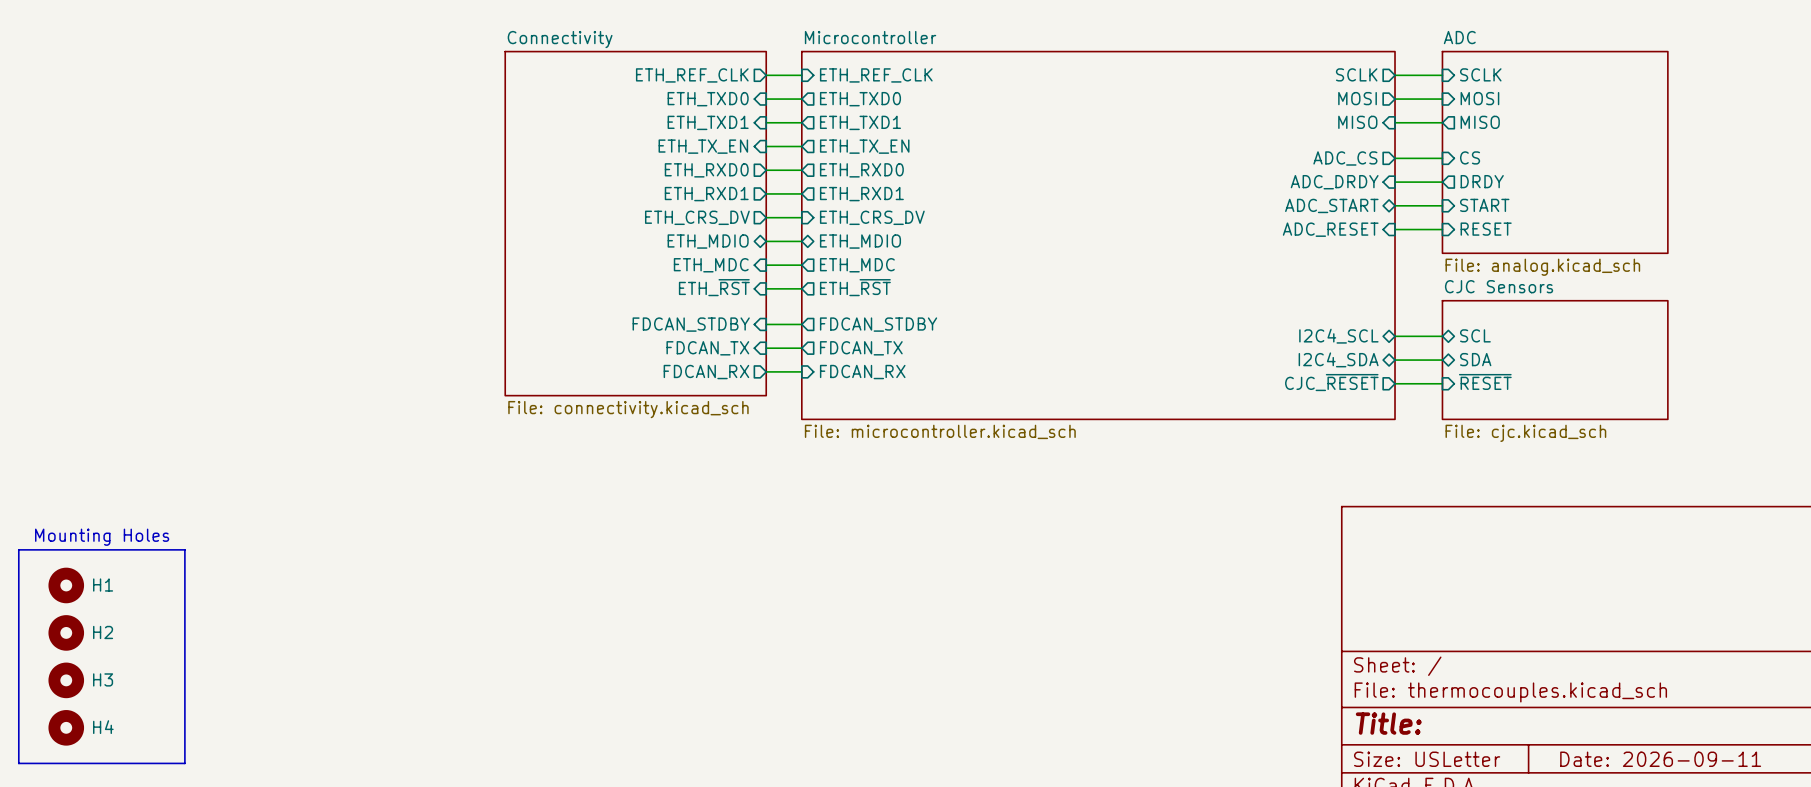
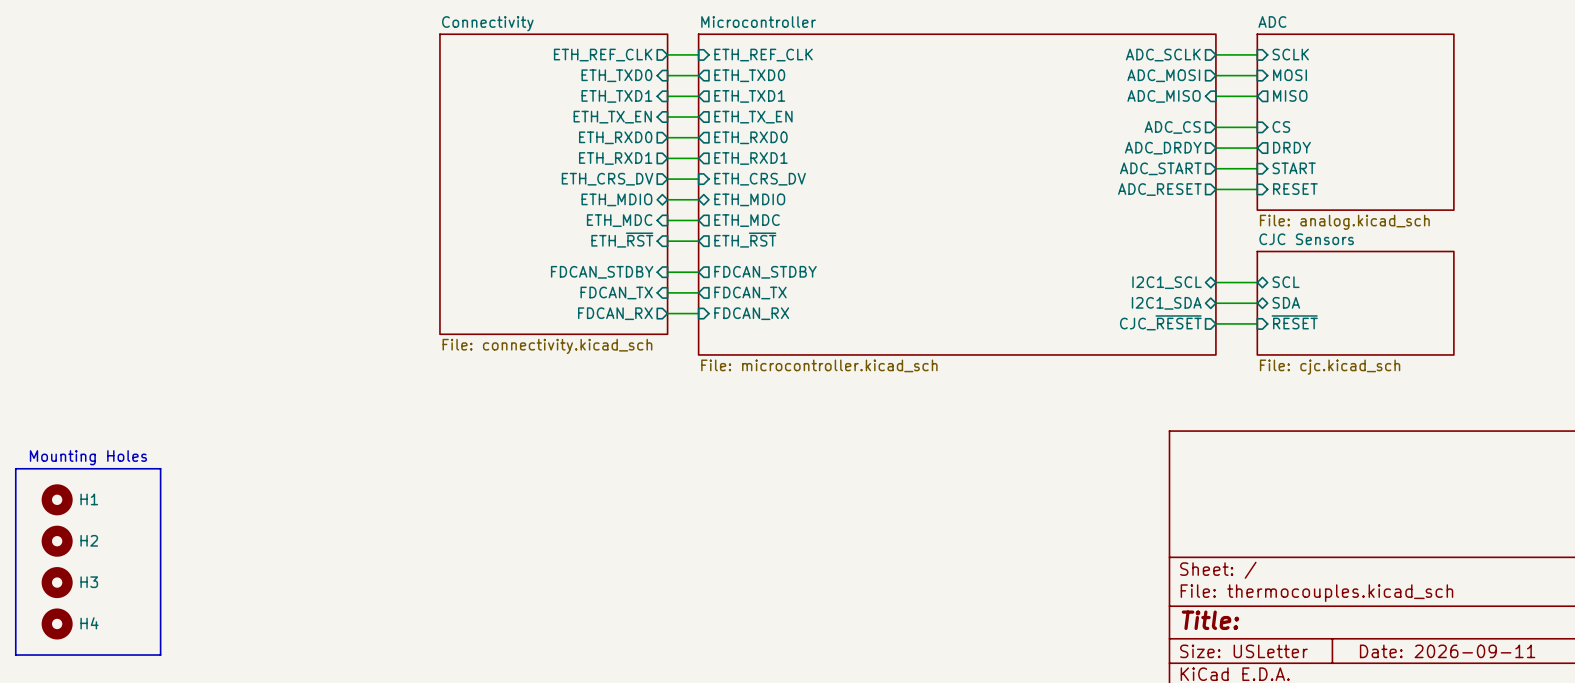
sheet pin: SCLK (1356, 74) -> ADC_SCLK (1163, 55)
sheet pin: MOSI (1357, 98) -> ADC_MOSI (1163, 75)
sheet pin: MISO (1357, 122) -> ADC_MISO (1164, 96)
sheet pin shape: input (1334, 182) -> output (1163, 148)
sheet pin shape: bidirectional (1331, 205) -> output (1160, 168)
sheet pin shape: input (1330, 229) -> output (1159, 189)
sheet pin: I2C4_SCL (1338, 336) -> I2C1_SCL (1166, 282)
sheet pin: I2C4_SDA (1338, 359) -> I2C1_SDA (1166, 303)

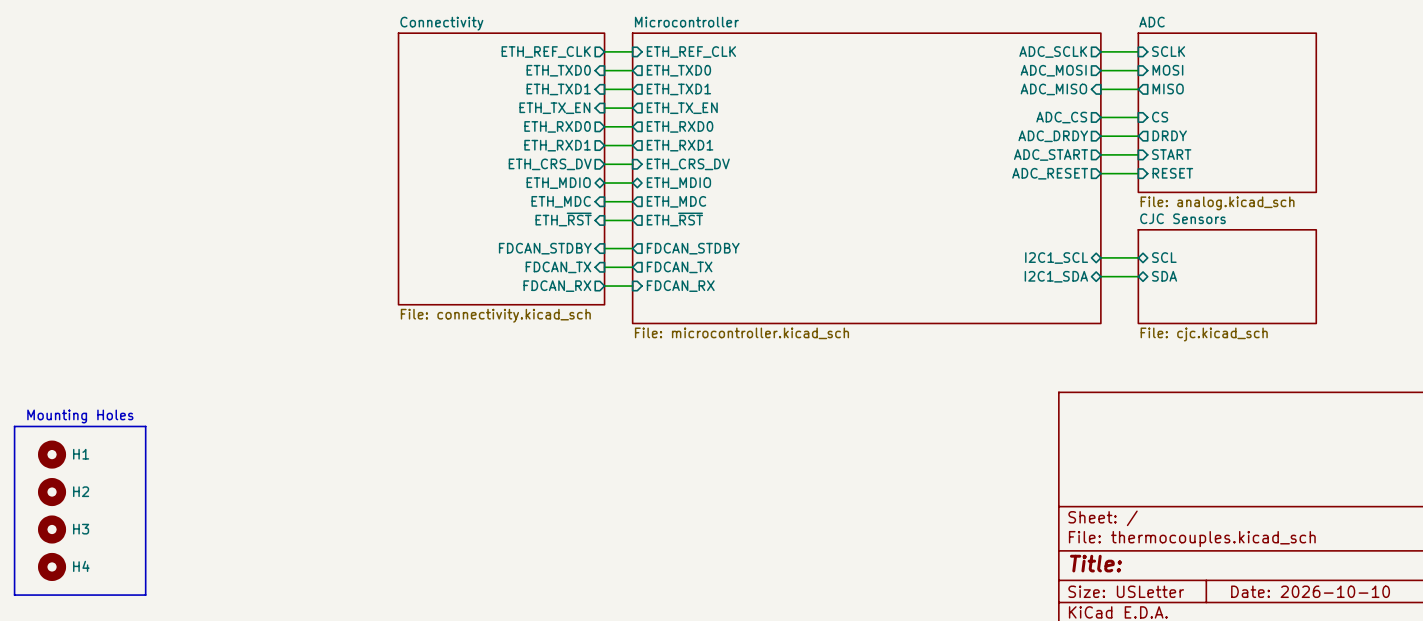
sheet pin: CJC_~{RESET} (1160, 322) -> none
sheet pin: ~{RESET} (1294, 322) -> none
wire: (1215, 323) (1257, 323) -> none
title block: Date: 2026-09-11 (1447, 651) -> Date: 2026-10-10 (1310, 591)

